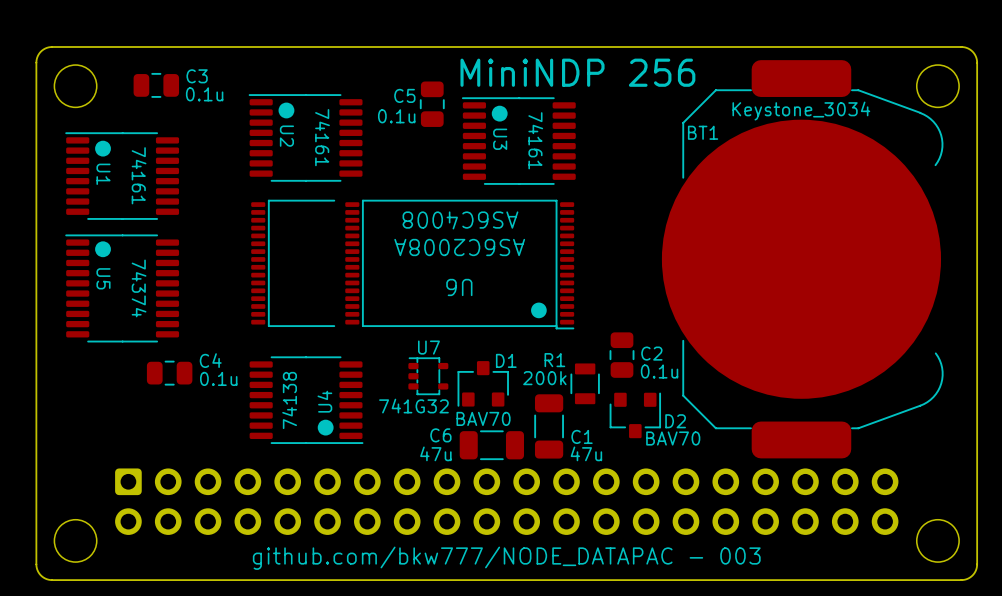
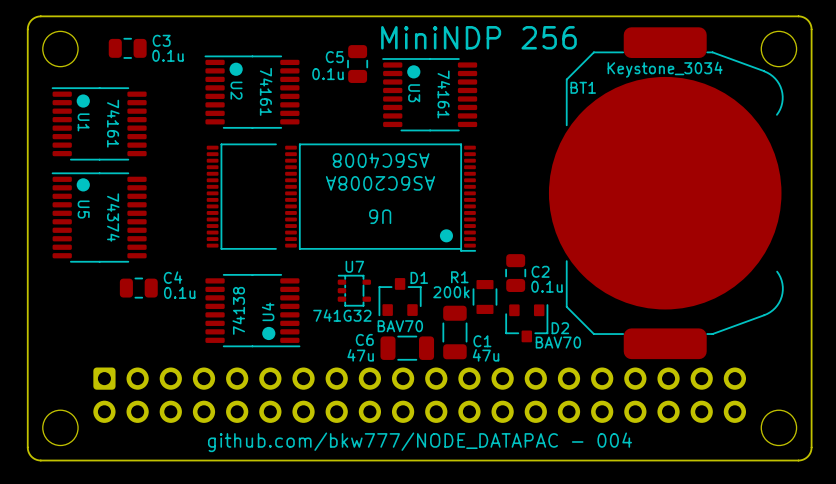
text: github.com/bkw777/NODE_DATAPAC - 003 (506, 558) -> github.com/bkw777/NODE_DATAPAC - 004 (419, 442)

